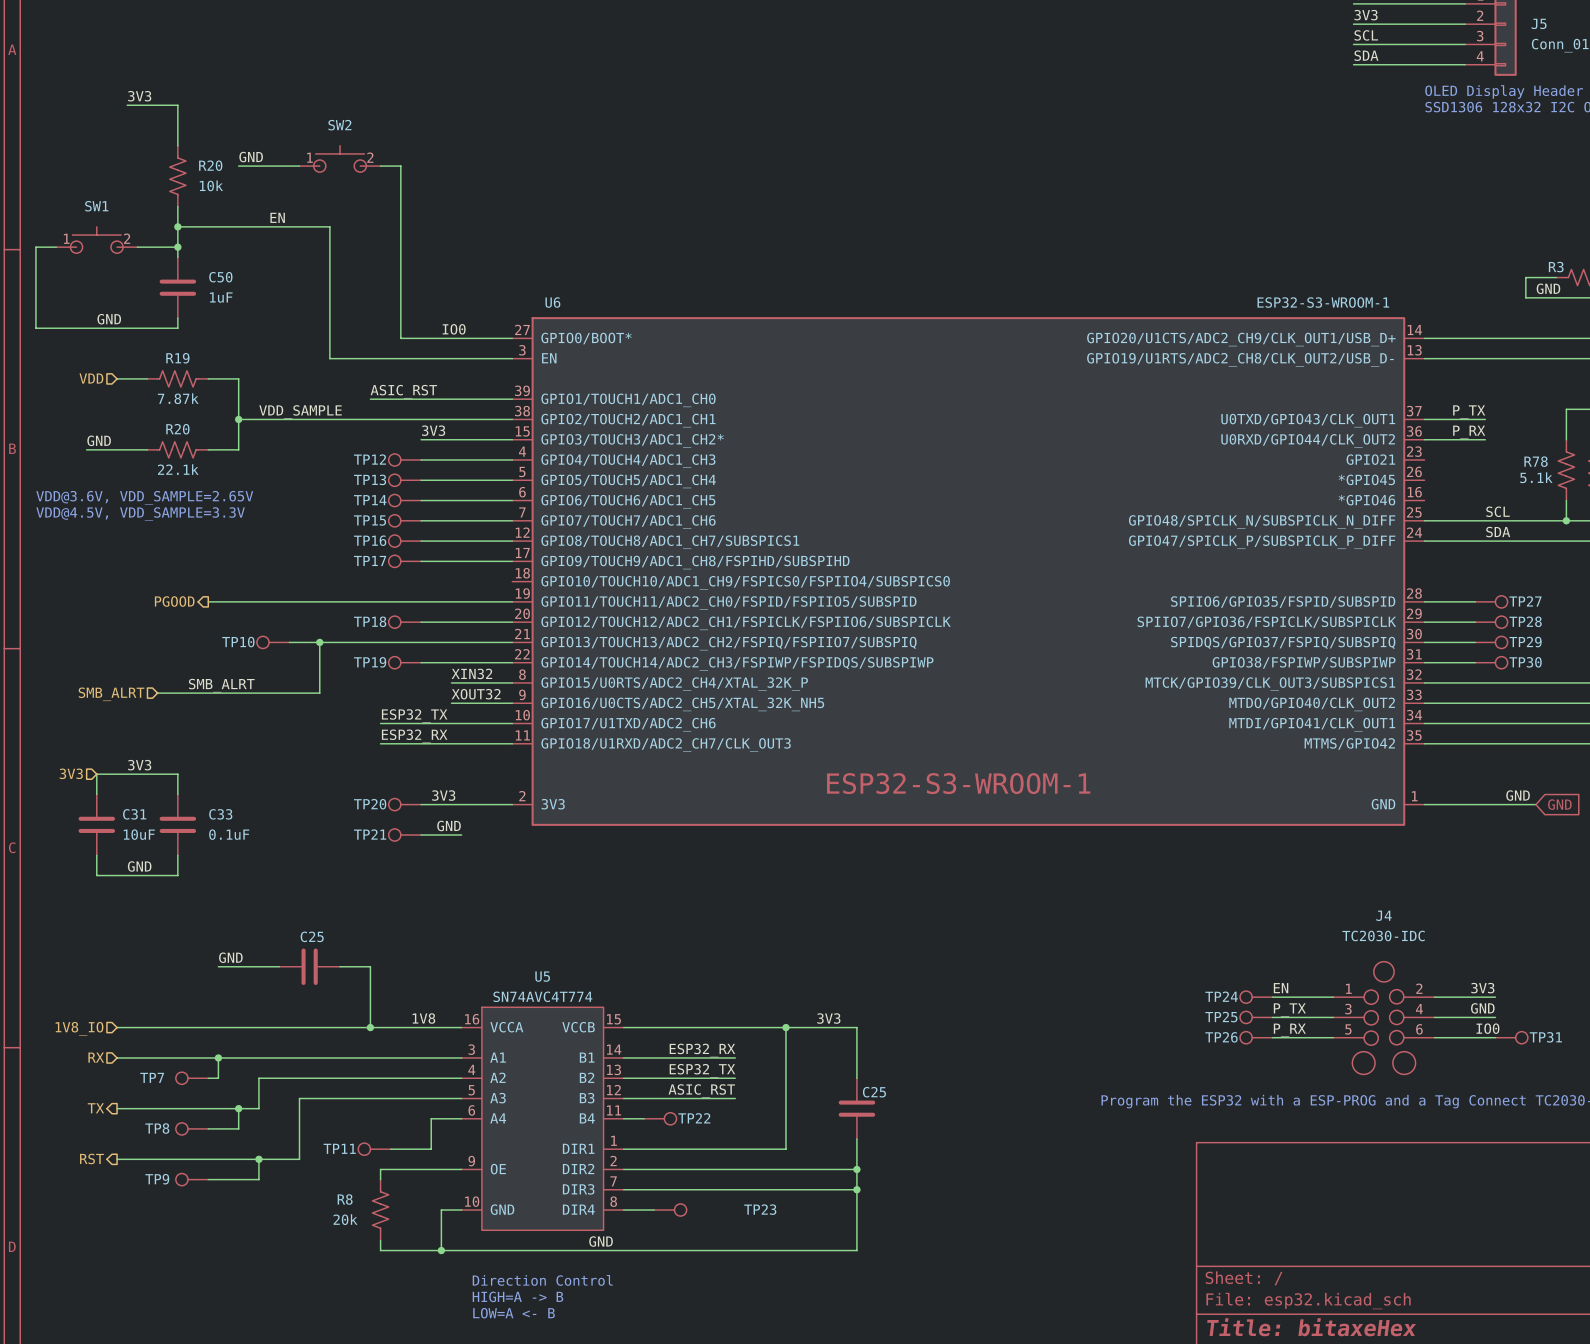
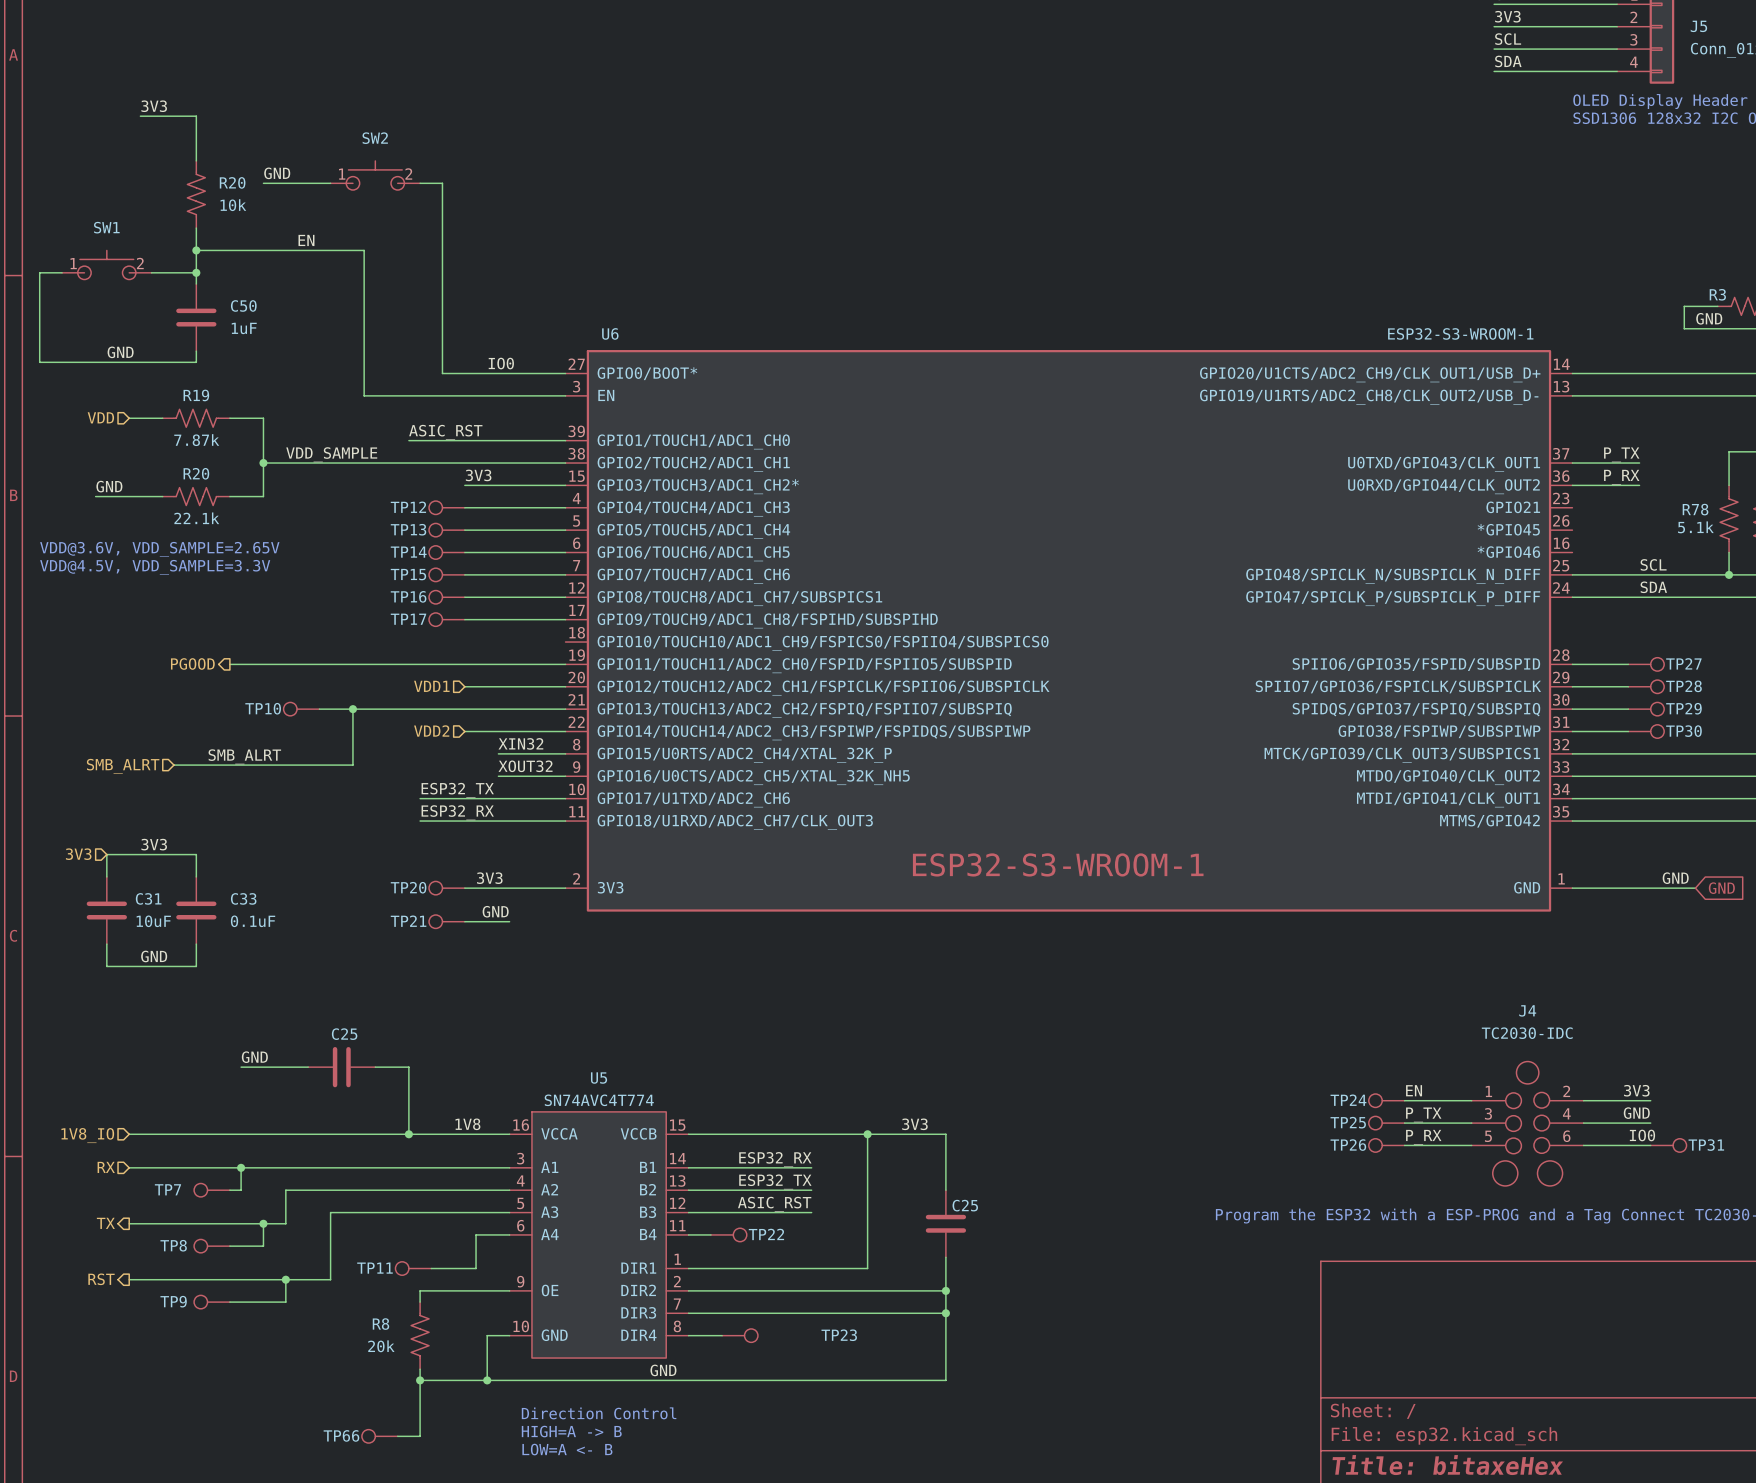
hierarchical label: none -> VDD1 (431, 686)
TP18: (404, 622) -> none
hierarchical label: none -> VDD2 (431, 731)
TP19: (404, 662) -> none
wire: none -> (420, 1380) (420, 1436) (397, 1436)
junction: none -> (420, 1380)
TP66: none -> (379, 1436)

